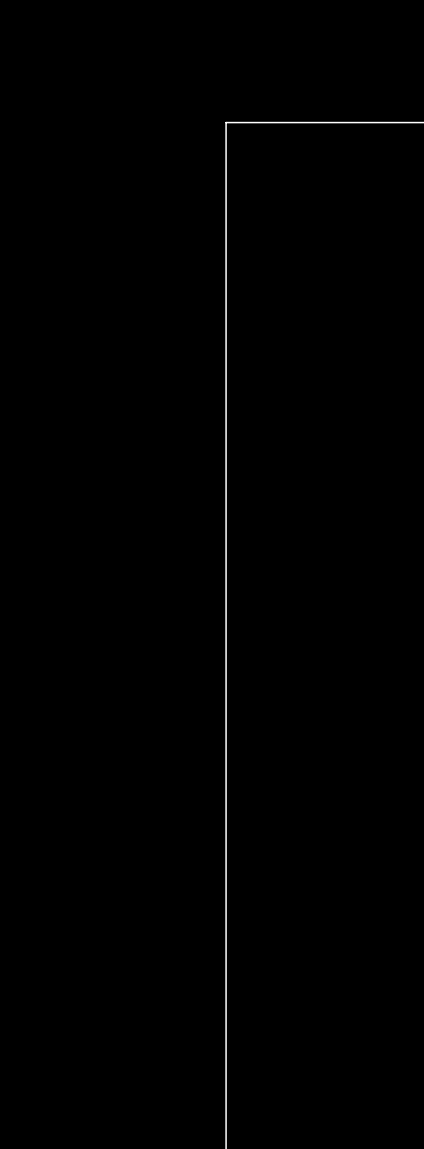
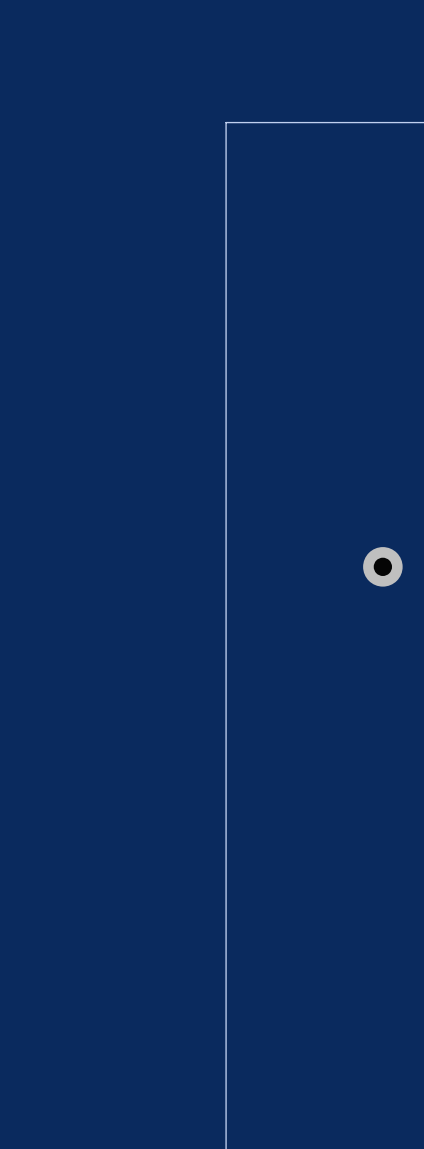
via: none -> (382, 566)

